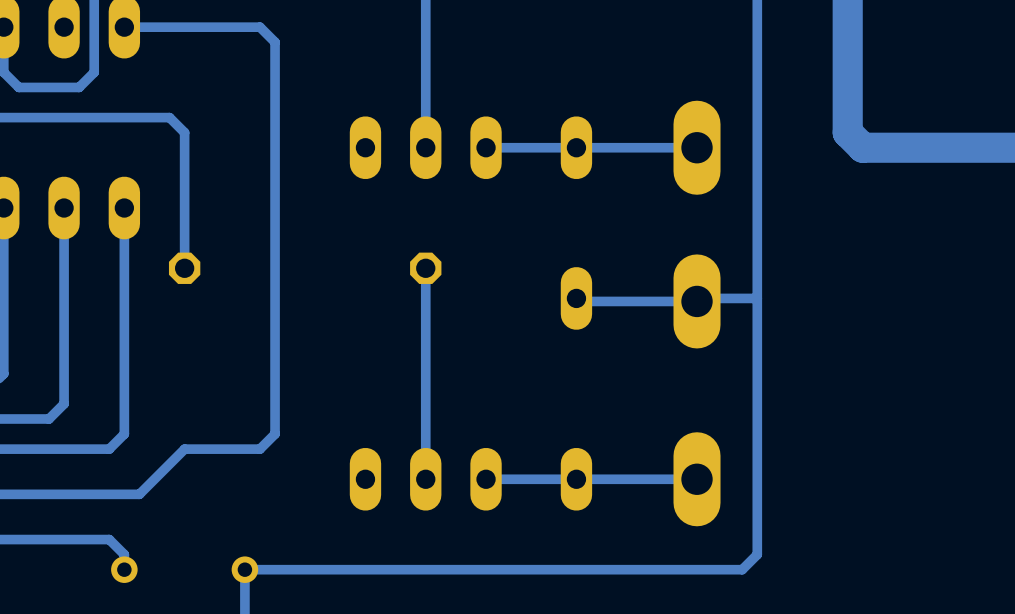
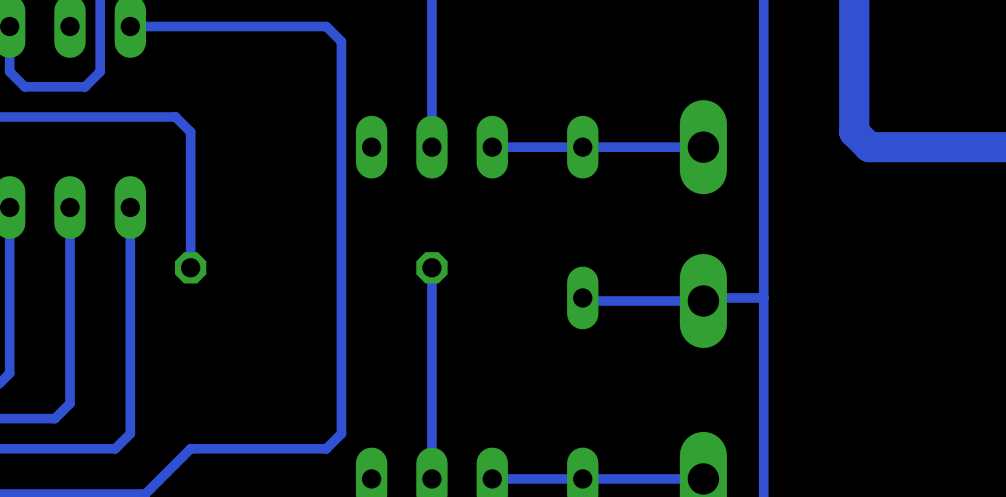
track: (259, 27) (275, 42) (275, 434) (259, 449) -> (266, 26) (326, 26) (341, 41) (341, 433) (326, 448) (266, 448)

